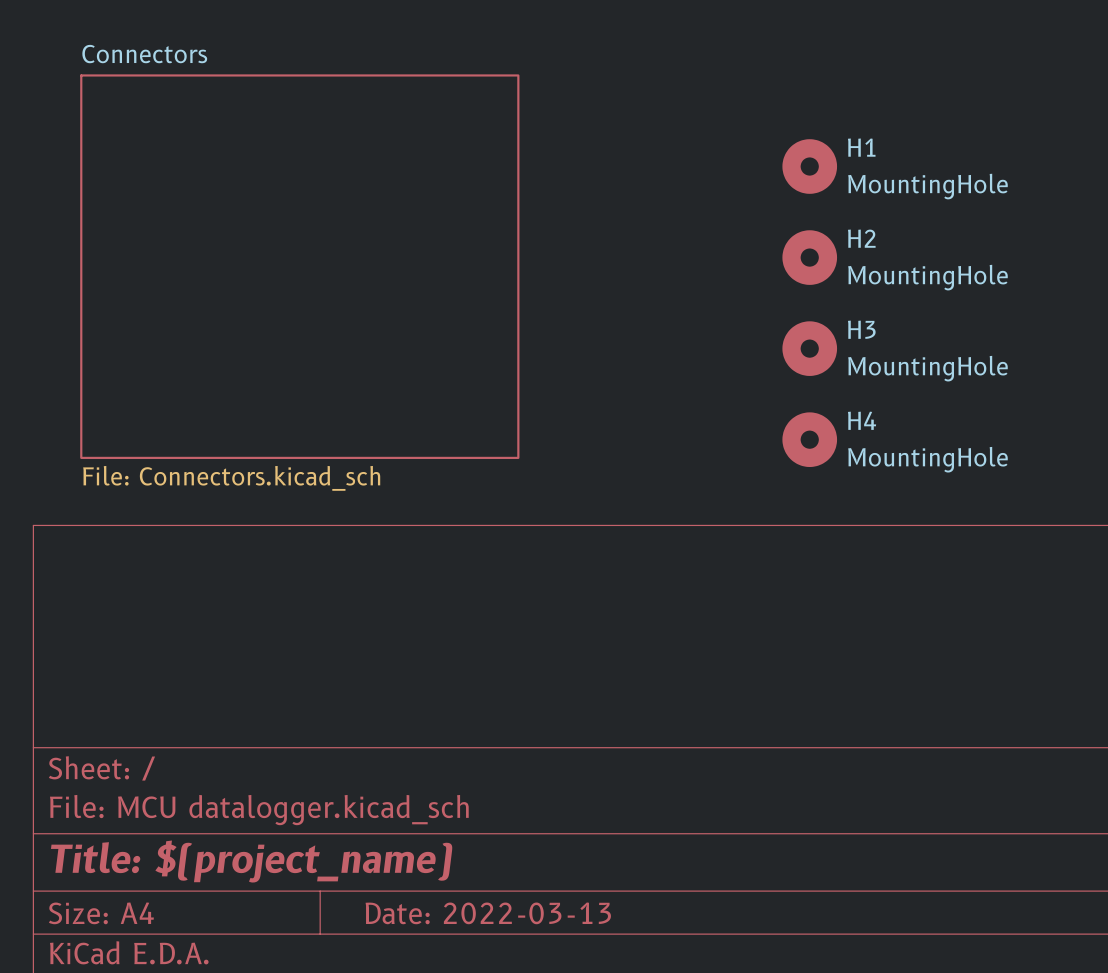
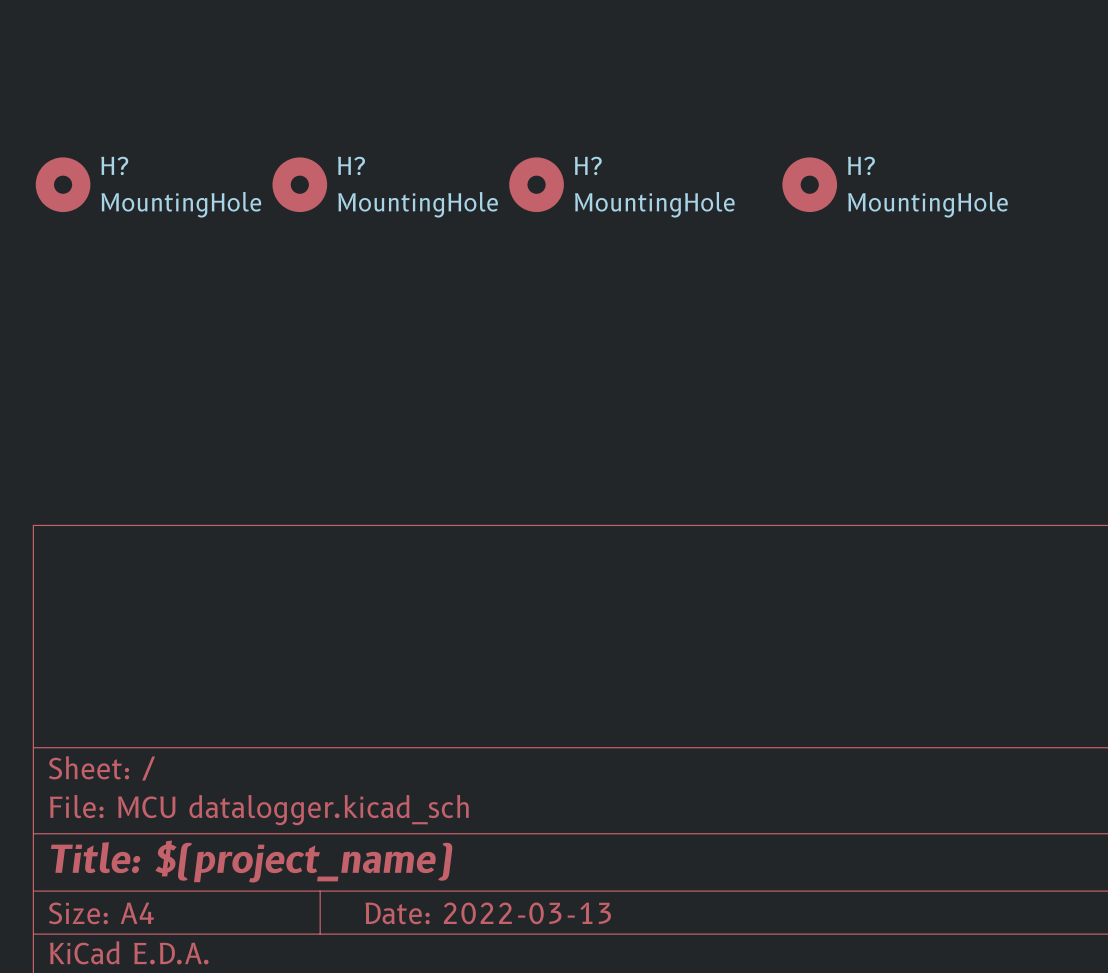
H1: MountingHole (809, 166) -> none
H?: none -> MountingHole (63, 184)
H?: none -> MountingHole (299, 184)
H?: none -> MountingHole (536, 184)
H?: none -> MountingHole (809, 184)
H2: MountingHole (809, 257) -> none
sheet Connectors: File: Connectors.kicad_sch (299, 266) -> none
H3: MountingHole (809, 348) -> none
H4: MountingHole (809, 439) -> none

